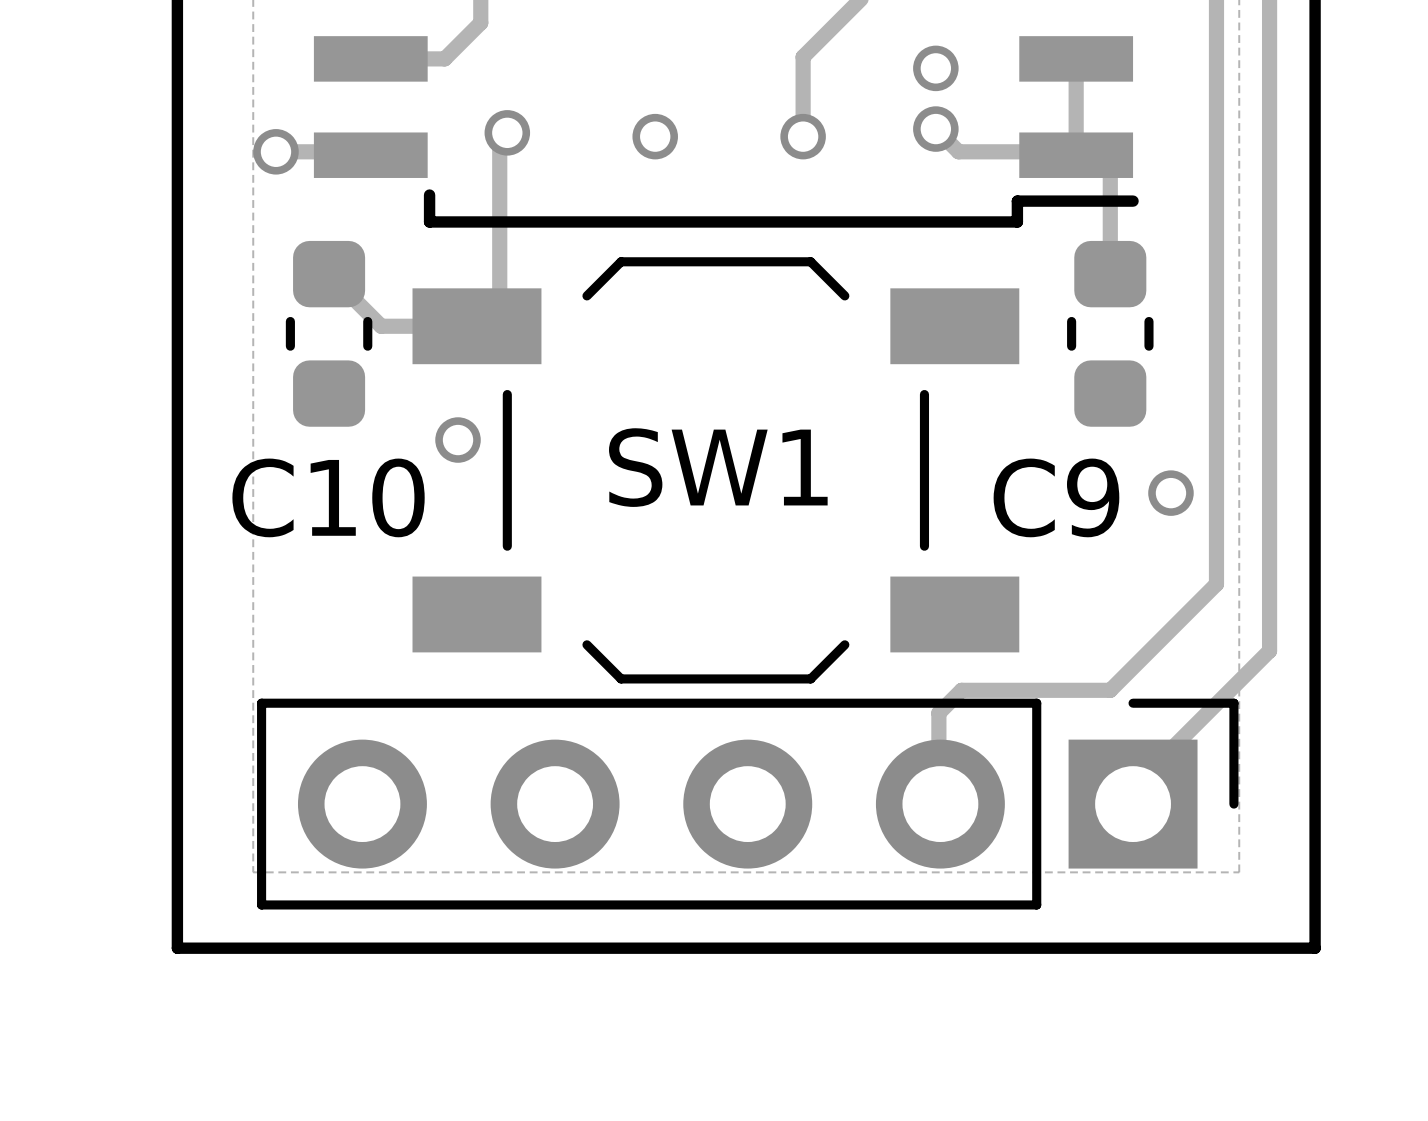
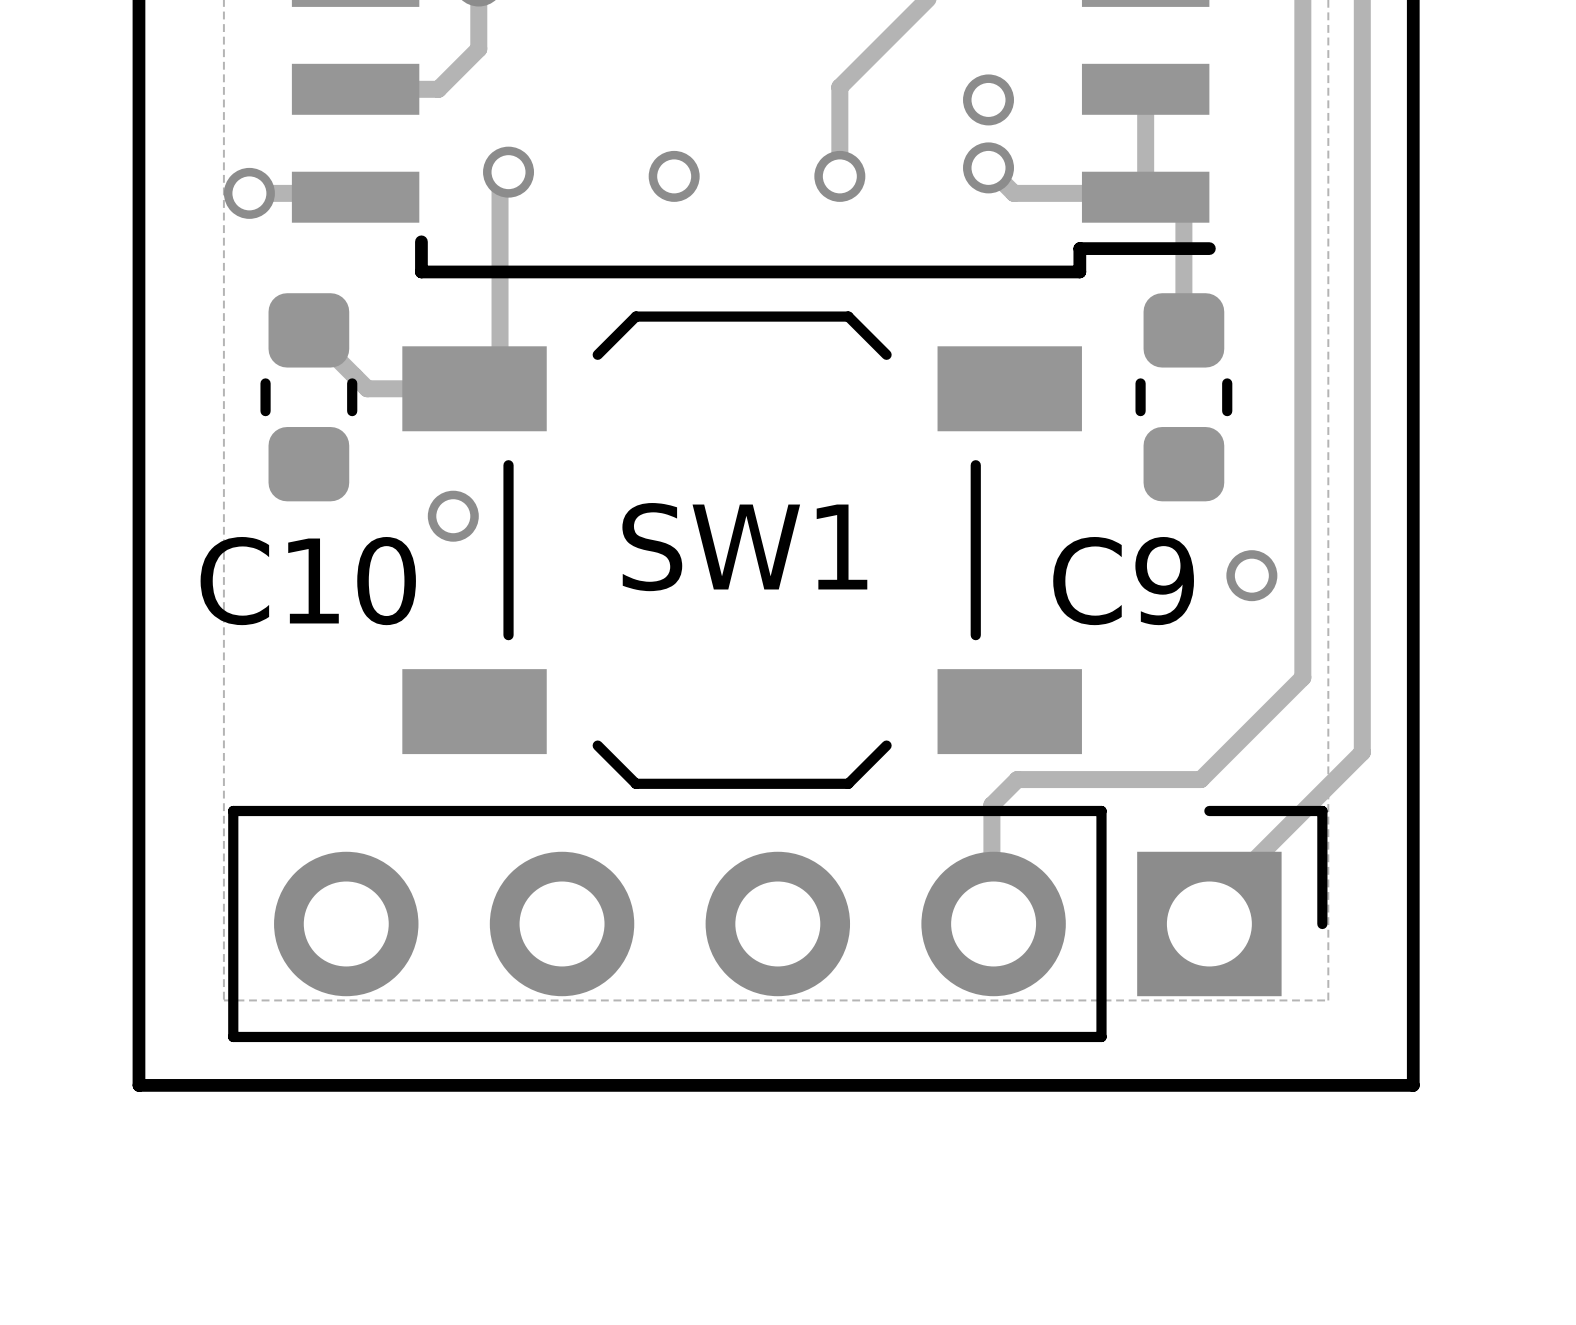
track: (1125, 675) (1110, 690) (961, 690) (938, 713) -> (1200, 779) (1017, 779) (991, 805) (991, 822)

